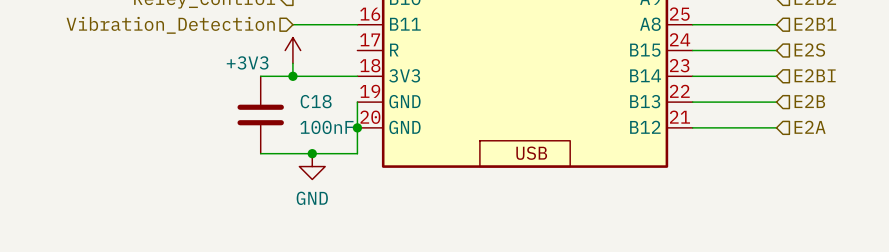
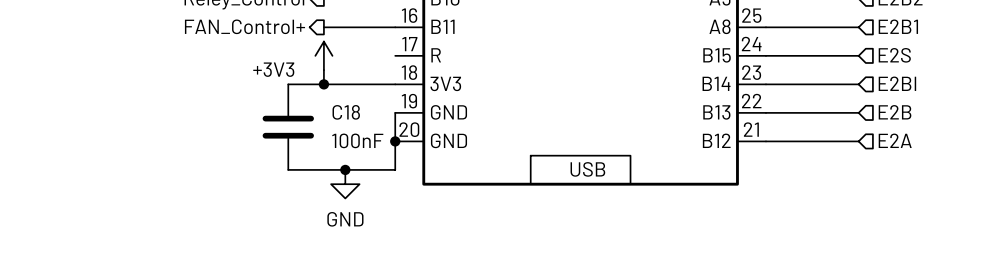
hierarchical label shape: input (170, 25) -> output (244, 26)
hierarchical label: Vibration_Detection (170, 25) -> FAN_Control+ (244, 26)

